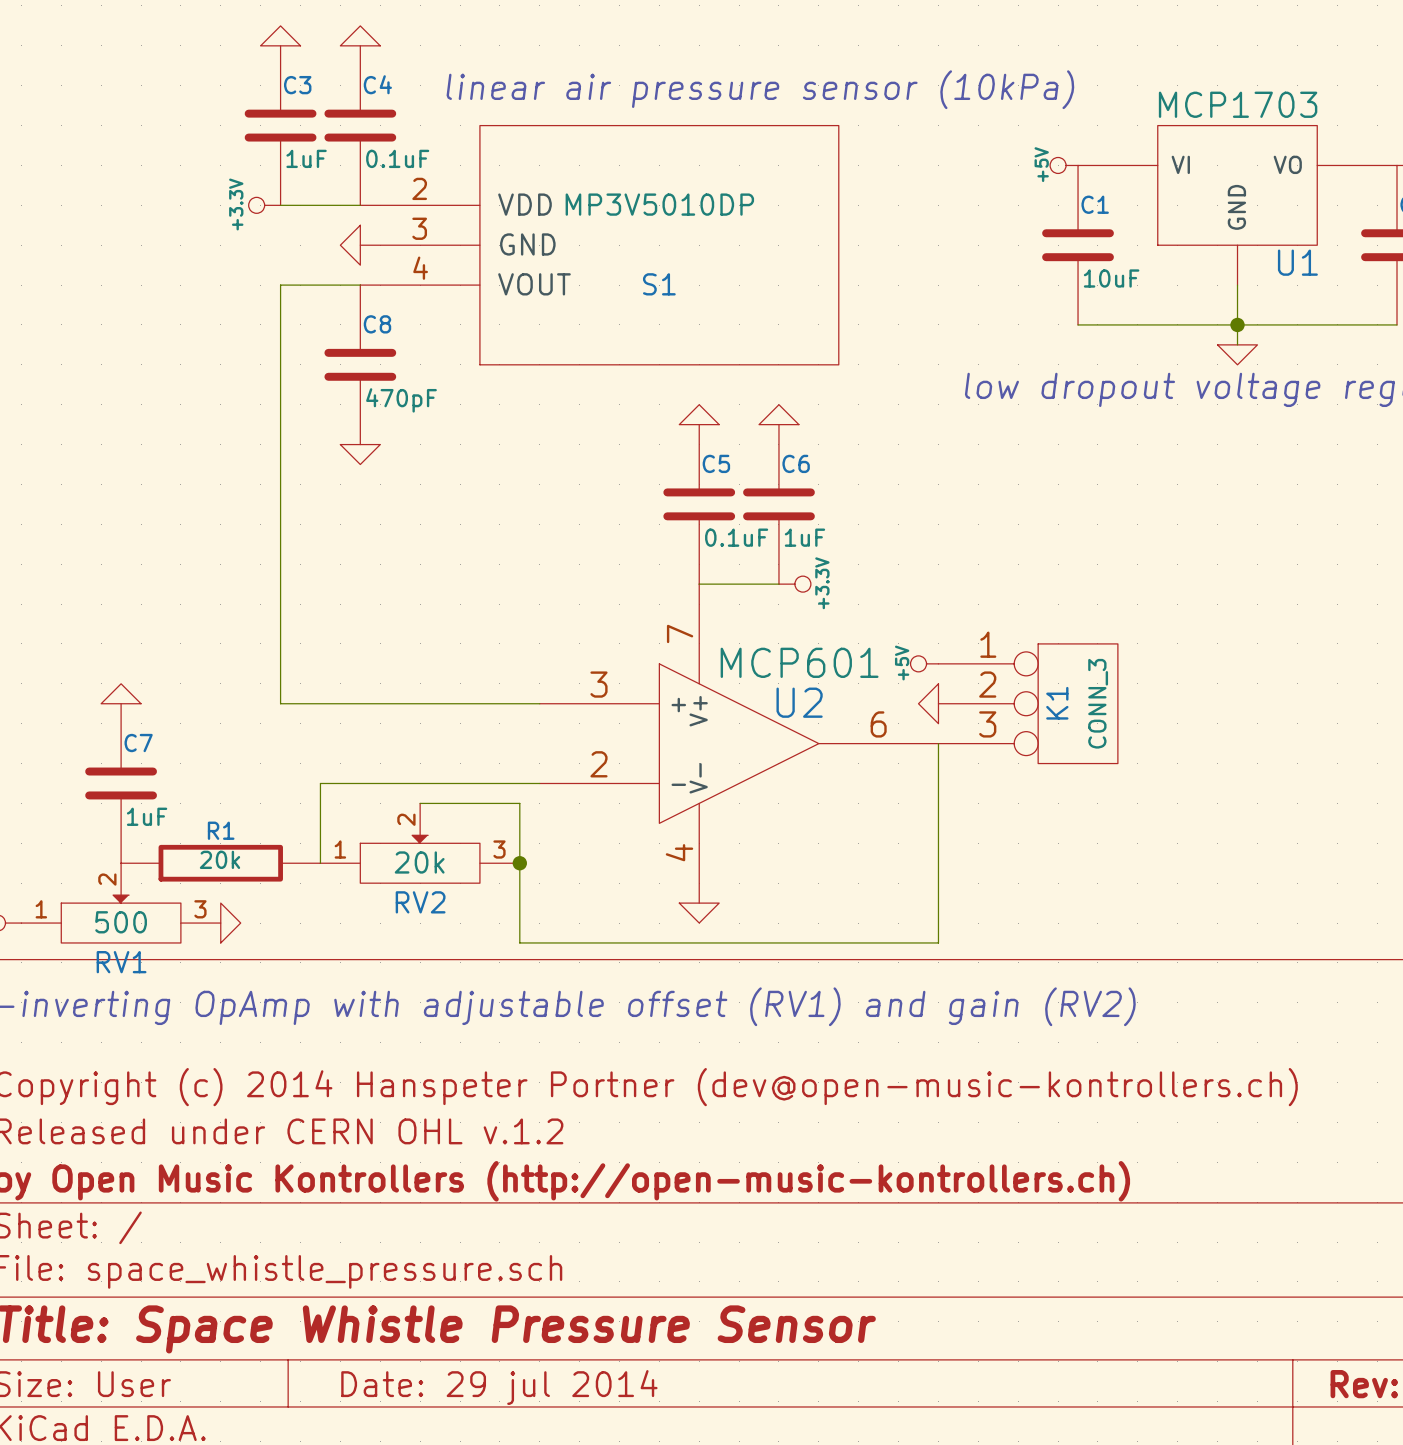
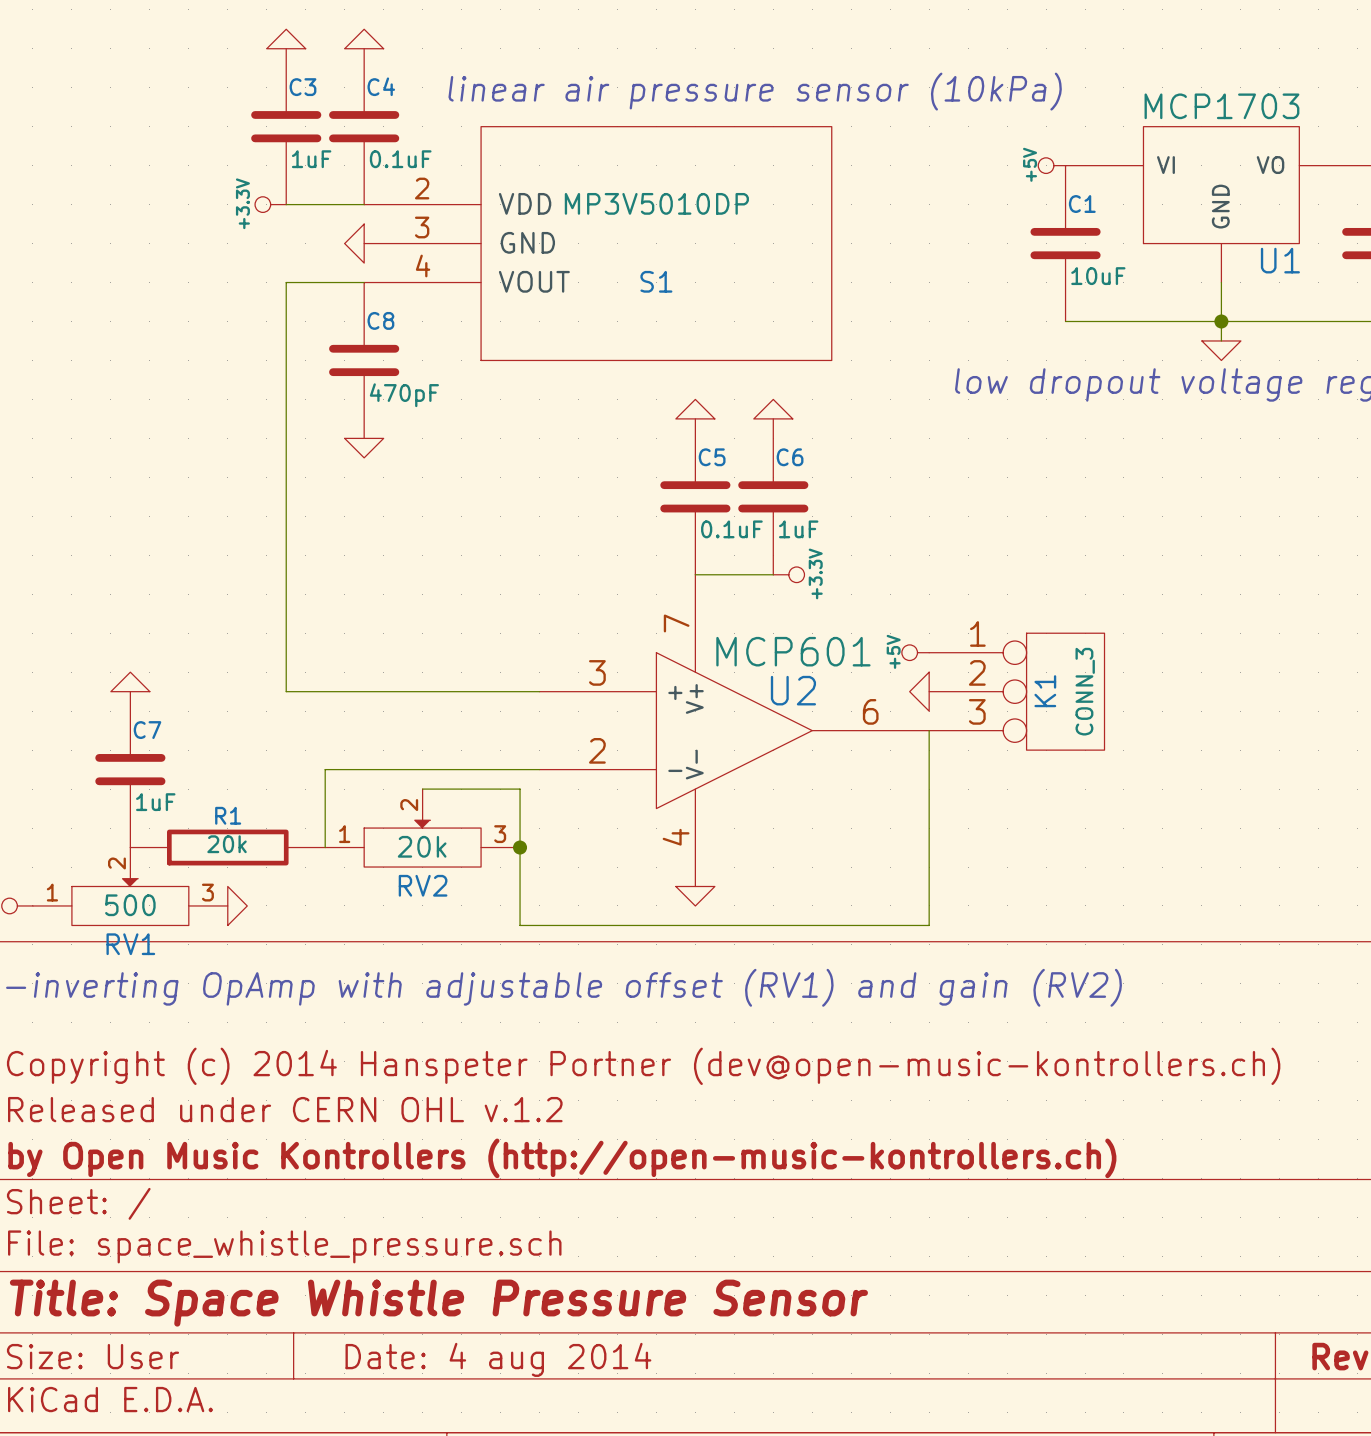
title block: Date: 29 jul 2014 (499, 1387) -> Date: 4 aug 2014 (498, 1359)

